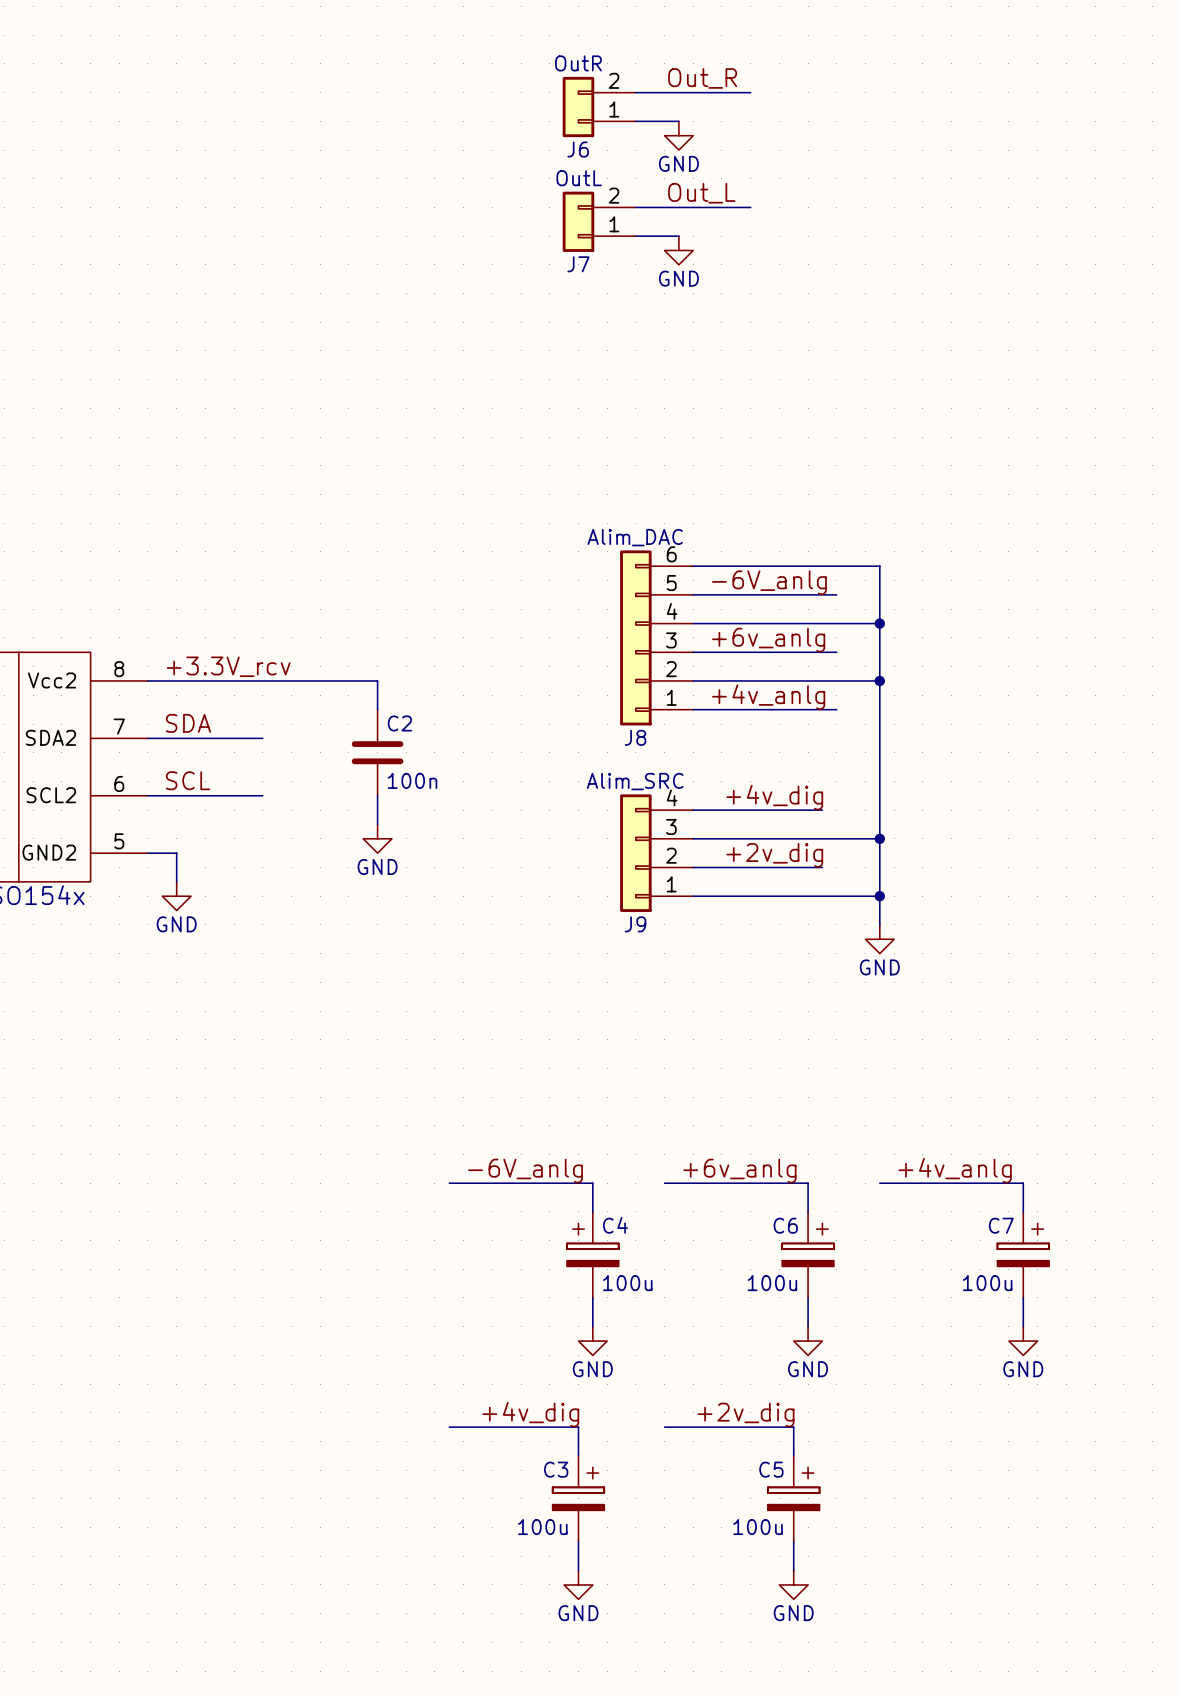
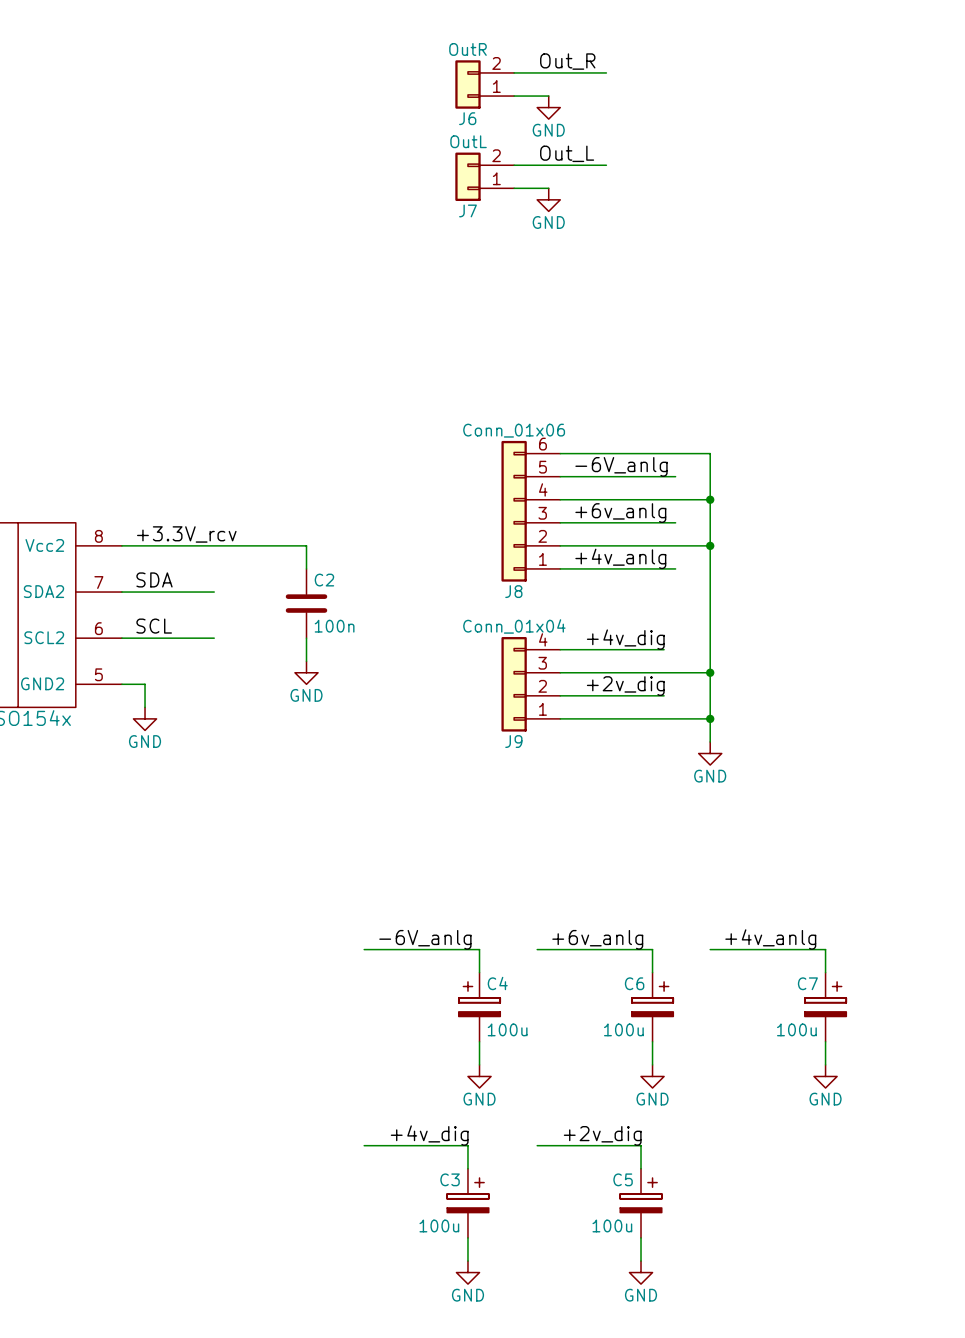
J8 value: Alim_DAC (635, 537) -> Conn_01x06 (514, 430)
J9 value: Alim_SRC (635, 781) -> Conn_01x04 (514, 626)

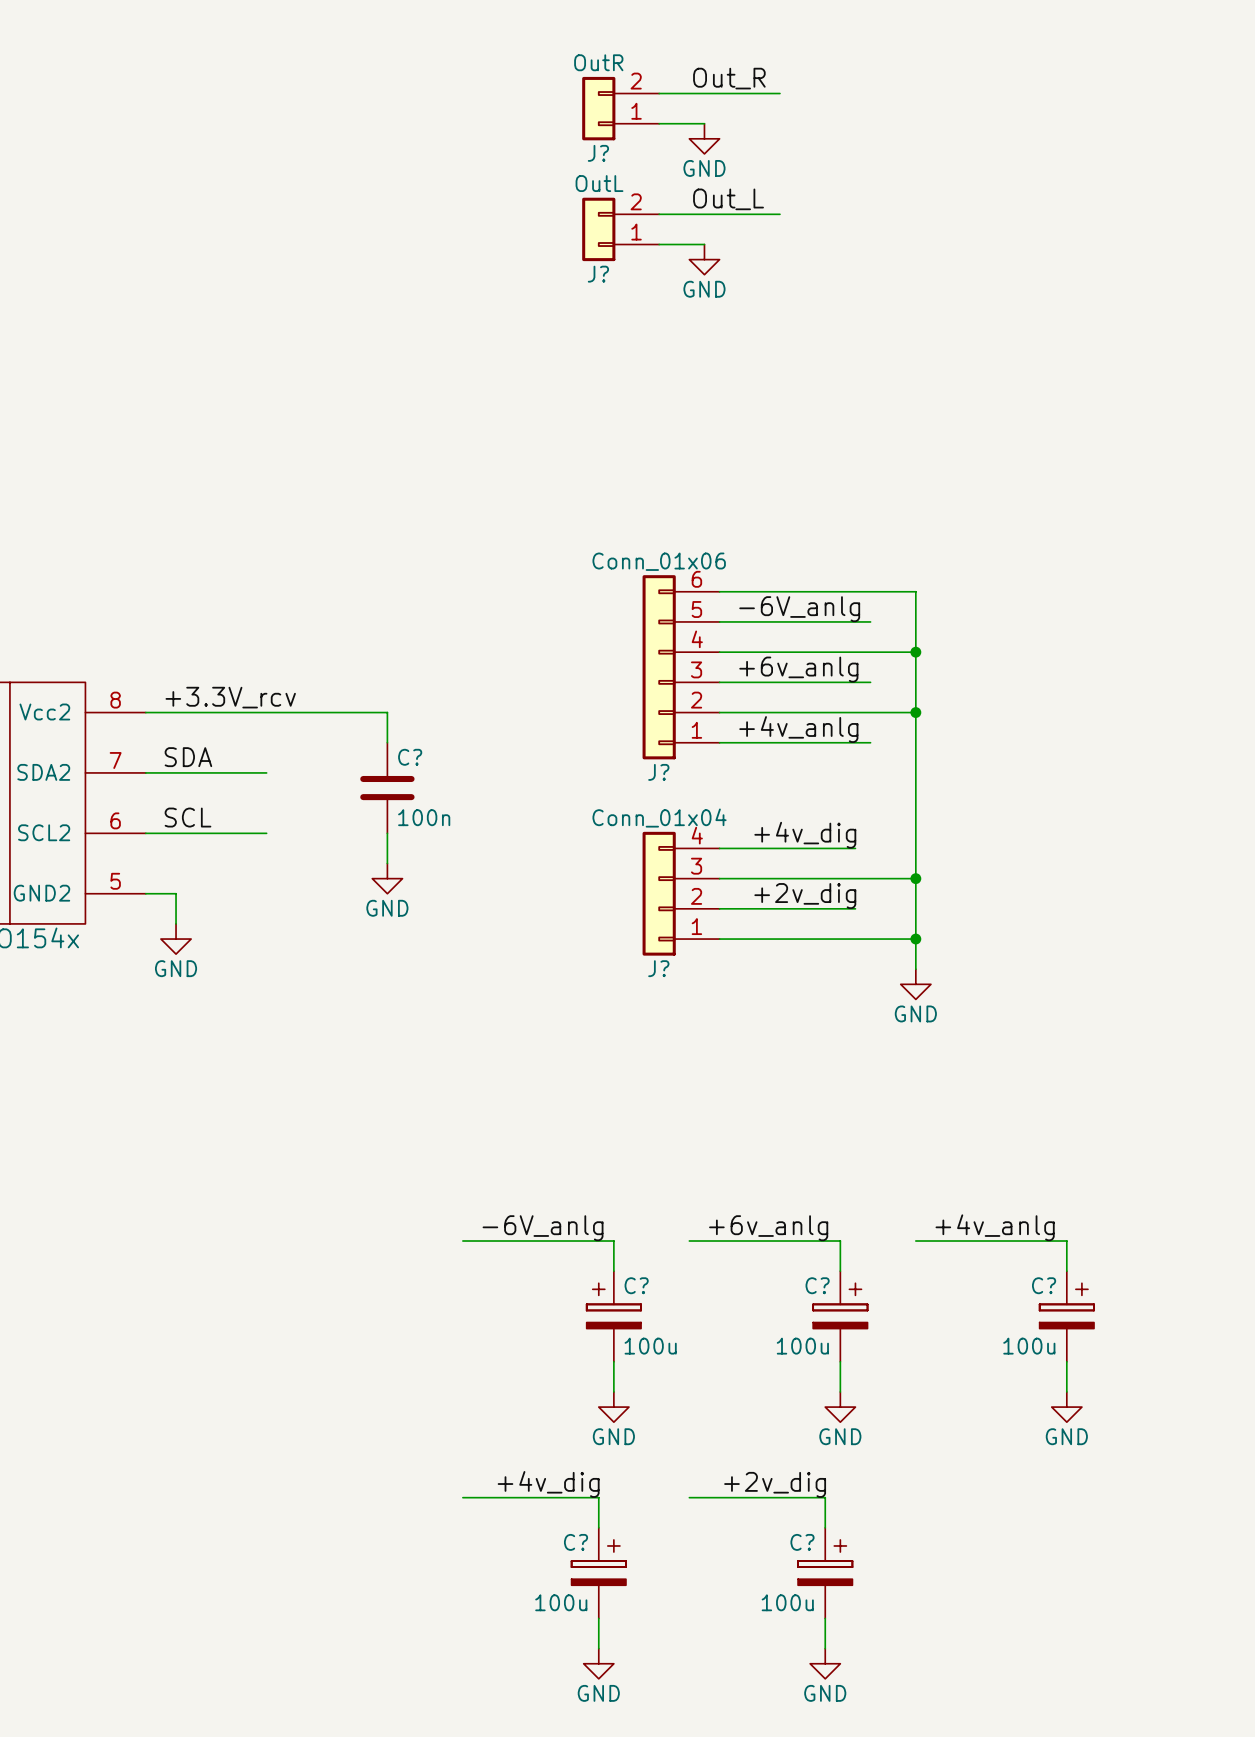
J6 name: J6 (467, 118) -> J? (598, 153)
J7 name: J7 (467, 210) -> J? (598, 274)
C2 name: C2 (324, 580) -> C? (410, 757)
J8 name: J8 (513, 591) -> J? (658, 772)
J9 name: J9 (513, 741) -> J? (658, 968)
C4 name: C4 (497, 983) -> C? (636, 1285)
C6 name: C6 (634, 983) -> C? (817, 1285)
C7 name: C7 (807, 983) -> C? (1044, 1285)
C3 name: C3 (450, 1179) -> C? (576, 1542)
C5 name: C5 (623, 1179) -> C? (802, 1542)

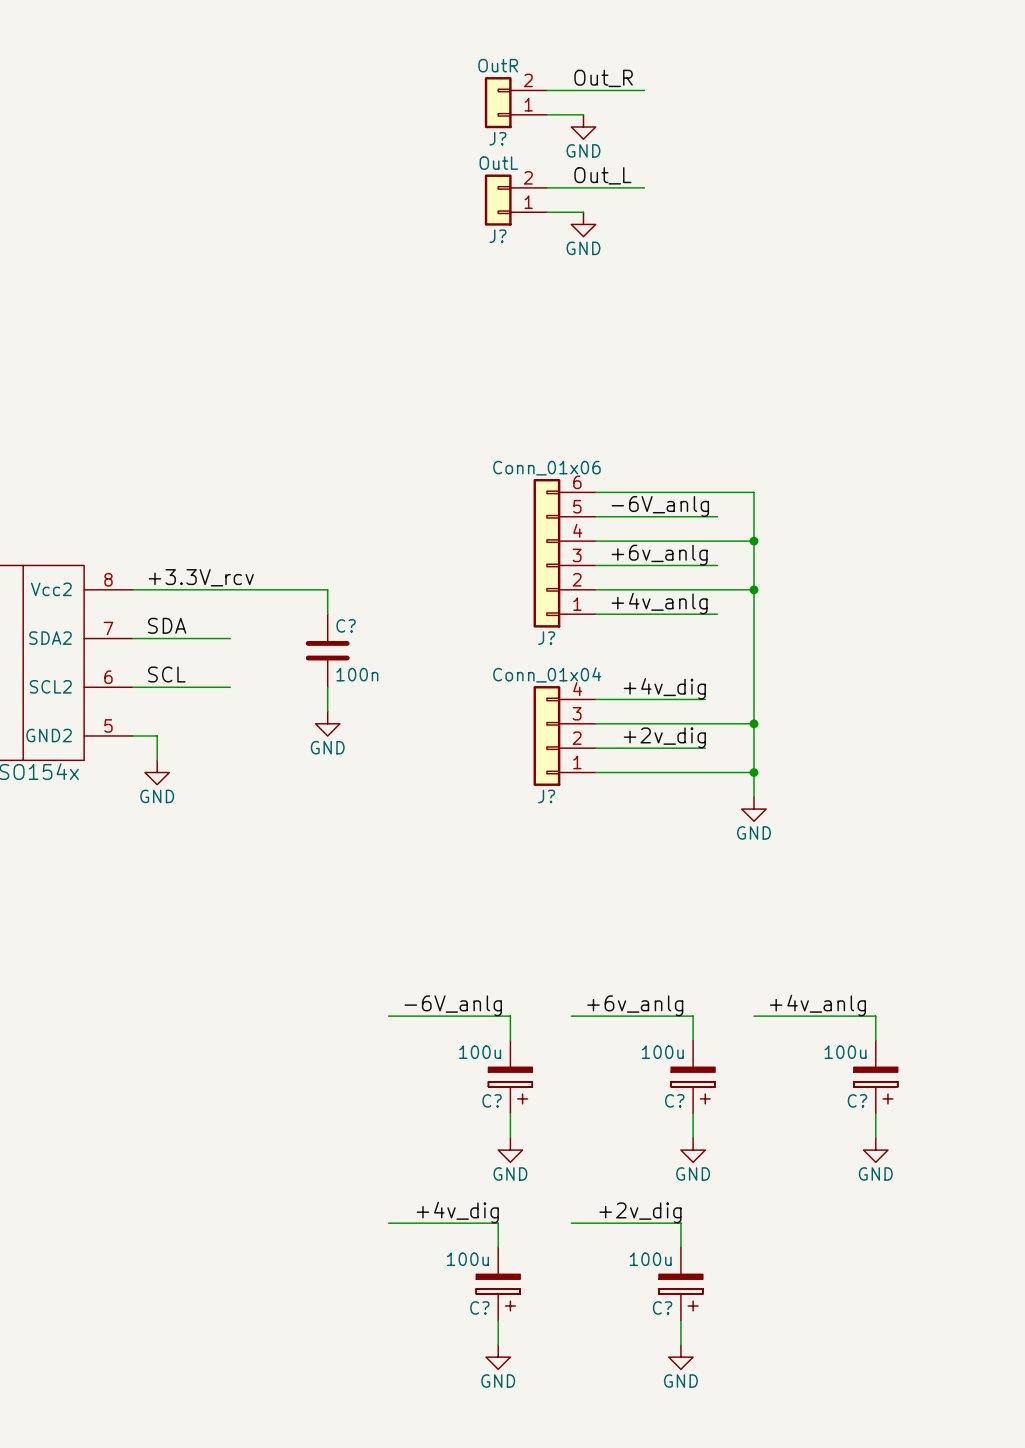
C? rotation: 0° (613, 1305) -> 180° (510, 1085)
C? flip: as is (840, 1305) -> up-down (693, 1085)
C? flip: as is (1066, 1305) -> up-down (875, 1085)
C? flip: as is (598, 1562) -> up-down (498, 1292)
C? flip: as is (825, 1562) -> up-down (680, 1292)

